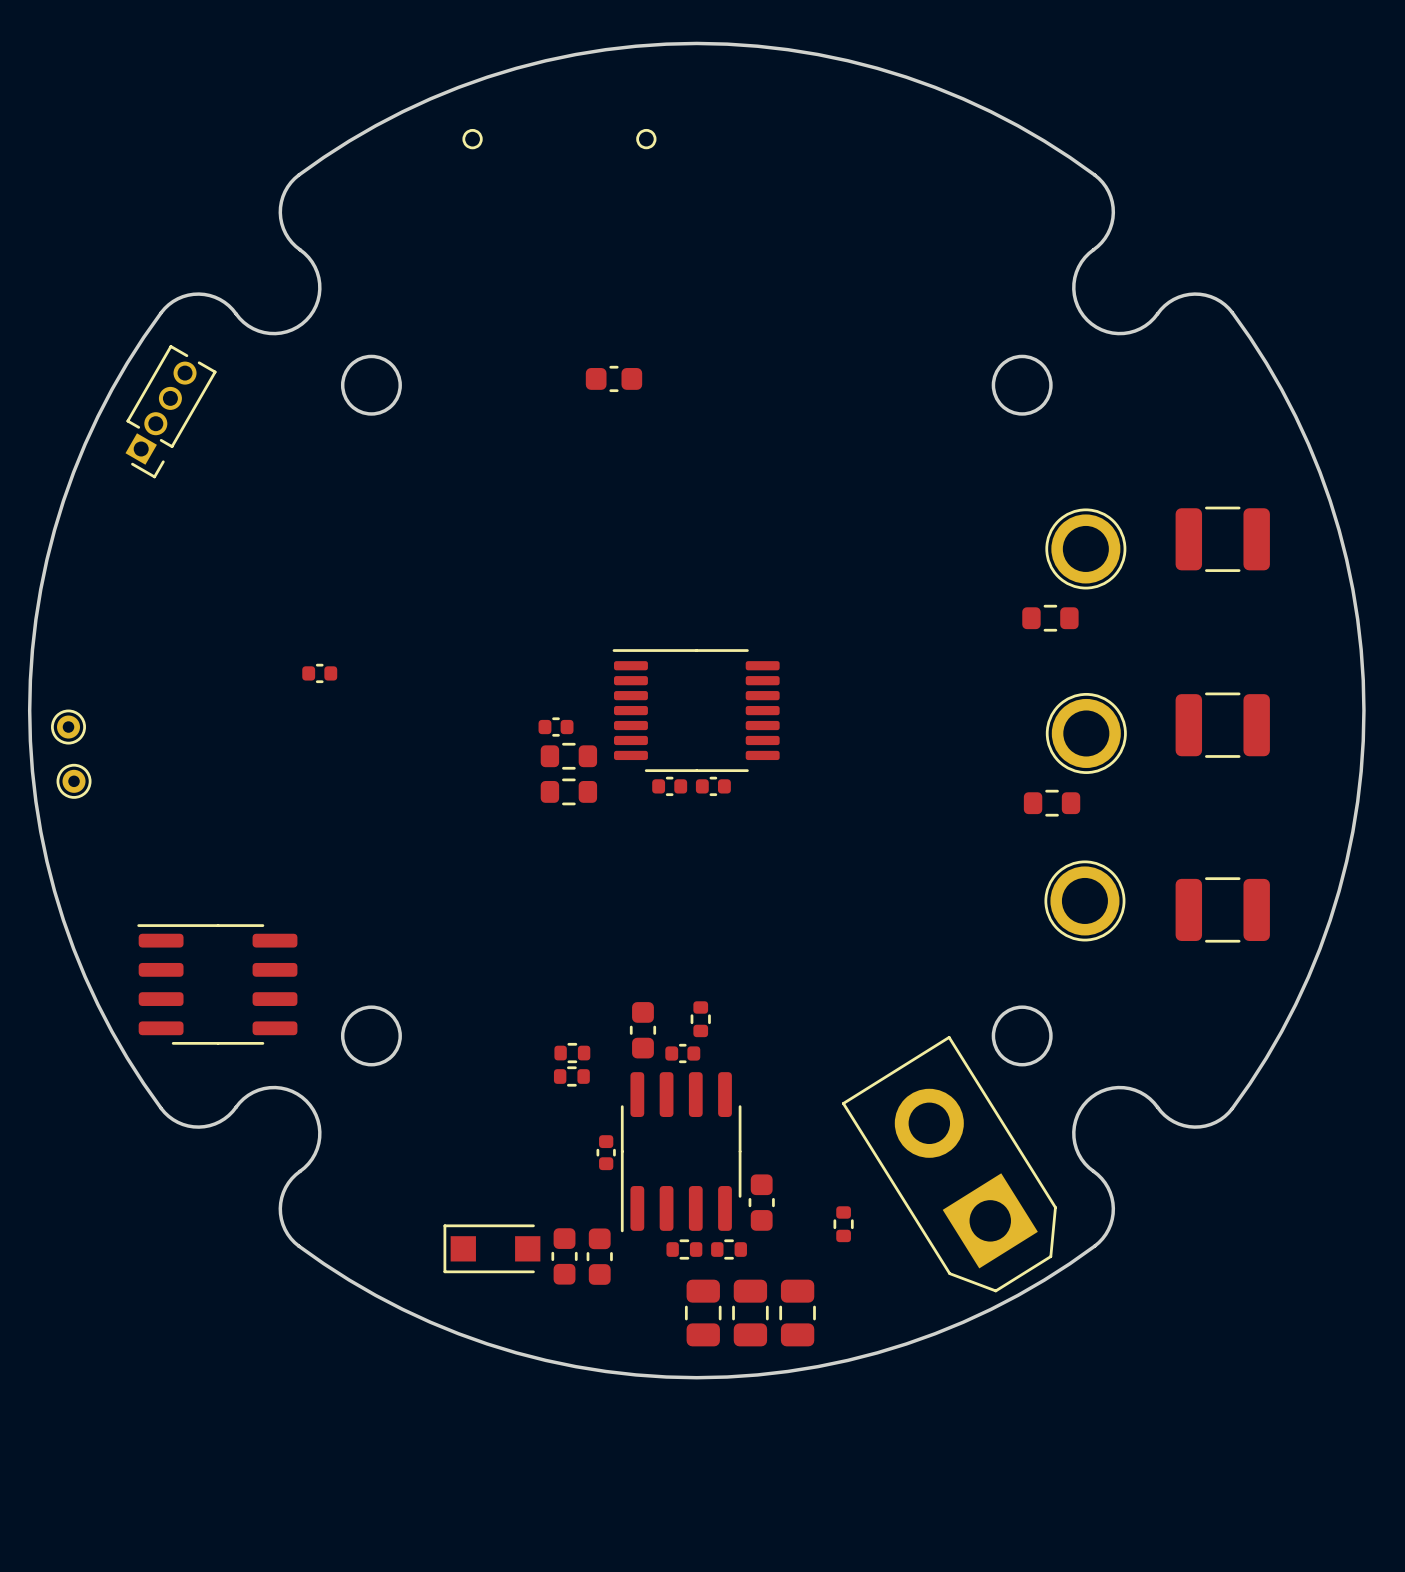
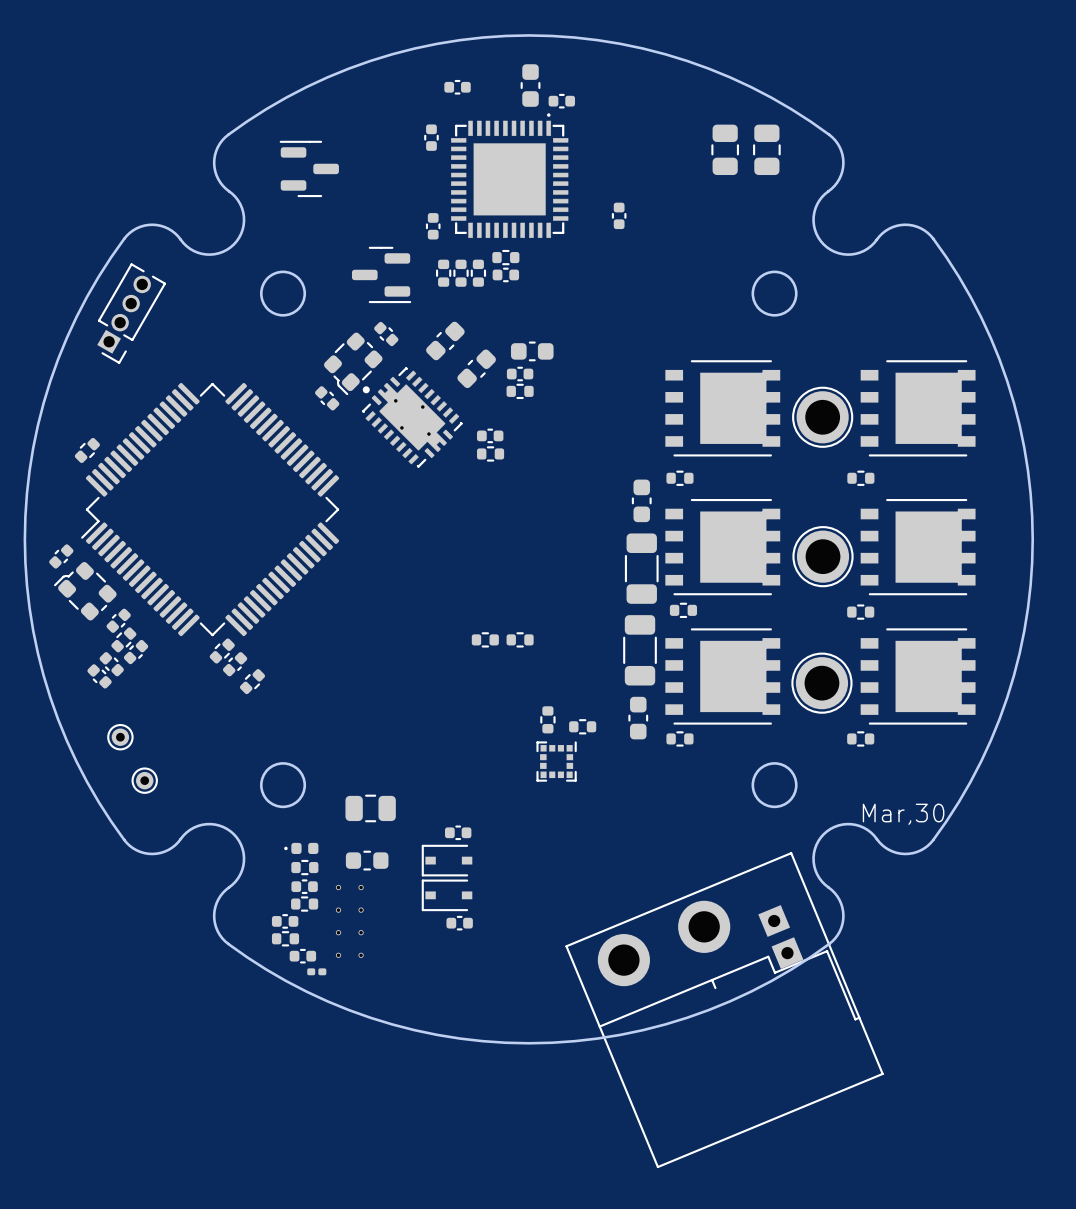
part: none -> (530, 85)
part: none -> (457, 87)
part: none -> (561, 101)
part: (472, 139) -> none
part: (646, 139) -> none
part: none -> (431, 137)
part: none -> (725, 149)
part: none -> (766, 149)
part: none -> (309, 168)
part: none -> (509, 175)
part: none -> (619, 215)
part: none -> (433, 226)
part: none -> (505, 257)
part: none -> (443, 273)
part: none -> (461, 273)
part: none -> (478, 273)
part: none -> (381, 274)
part: none -> (505, 274)
part position: (613, 378) -> (532, 351)
part: none -> (386, 334)
part: none -> (445, 340)
part: none -> (353, 363)
part: none -> (476, 368)
part: none -> (520, 374)
part footprint: [1175, 506, 1270, 572] -> [860, 360, 976, 457]
part: none -> (520, 391)
part: none -> (327, 398)
part: none -> (722, 408)
part: none -> (412, 417)
part: none -> (490, 435)
part: none -> (87, 450)
part: none -> (490, 453)
part: (1050, 618) -> none
part: none -> (679, 478)
part: none -> (860, 478)
part: none -> (641, 500)
part: none -> (210, 509)
part: (319, 673) -> none
part footprint: [1175, 692, 1270, 758] -> [860, 498, 976, 596]
part footprint: [51, 709, 86, 745] -> [49, 544, 74, 569]
part: (696, 710) -> none
part: none -> (722, 547)
part: (556, 727) -> none
part: none -> (641, 568)
part: (568, 756) -> none
part: none -> (85, 591)
part: (74, 781) -> none
part: (669, 786) -> none
part: (713, 786) -> none
part: (568, 791) -> none
part: (1052, 803) -> none
part: none -> (683, 610)
part: none -> (860, 612)
part: none -> (118, 620)
part: none -> (123, 639)
part: none -> (485, 639)
part: none -> (520, 639)
part: none -> (640, 650)
part: none -> (222, 651)
part: none -> (136, 652)
part: none -> (111, 664)
part: none -> (235, 664)
part footprint: [1175, 877, 1270, 943] -> [860, 628, 976, 725]
part: none -> (99, 676)
part: none -> (722, 676)
part: none -> (252, 681)
part: none -> (638, 718)
part: none -> (547, 719)
part: none -> (582, 726)
part: none -> (120, 737)
part: none -> (679, 738)
part: none -> (860, 738)
part: (217, 984) -> none
part: none -> (556, 761)
part: (700, 1019) -> none
part: none -> (144, 780)
part: (642, 1030) -> none
part: (572, 1053) -> none
part: (682, 1053) -> none
part: none -> (370, 808)
text: none -> Mar,30 (903, 814)
part: (571, 1076) -> none
part: none -> (458, 832)
part: none -> (301, 848)
part: none -> (367, 860)
part: none -> (447, 860)
part: none -> (304, 867)
part: (606, 1152) -> none
part: (681, 1152) -> none
part: (949, 1164) -> none
part: none -> (304, 886)
part: none -> (447, 895)
part: none -> (304, 904)
part: (761, 1202) -> none
part: none -> (285, 921)
part: none -> (349, 921)
part: none -> (459, 923)
part: (843, 1224) -> none
part: none -> (285, 938)
part: (491, 1248) -> none
part: (684, 1249) -> none
part: (729, 1249) -> none
part: (564, 1256) -> none
part: (599, 1256) -> none
part: none -> (302, 956)
part: none -> (316, 971)
part: (703, 1313) -> none
part: (750, 1313) -> none
part: (797, 1313) -> none
part: none -> (724, 1010)

